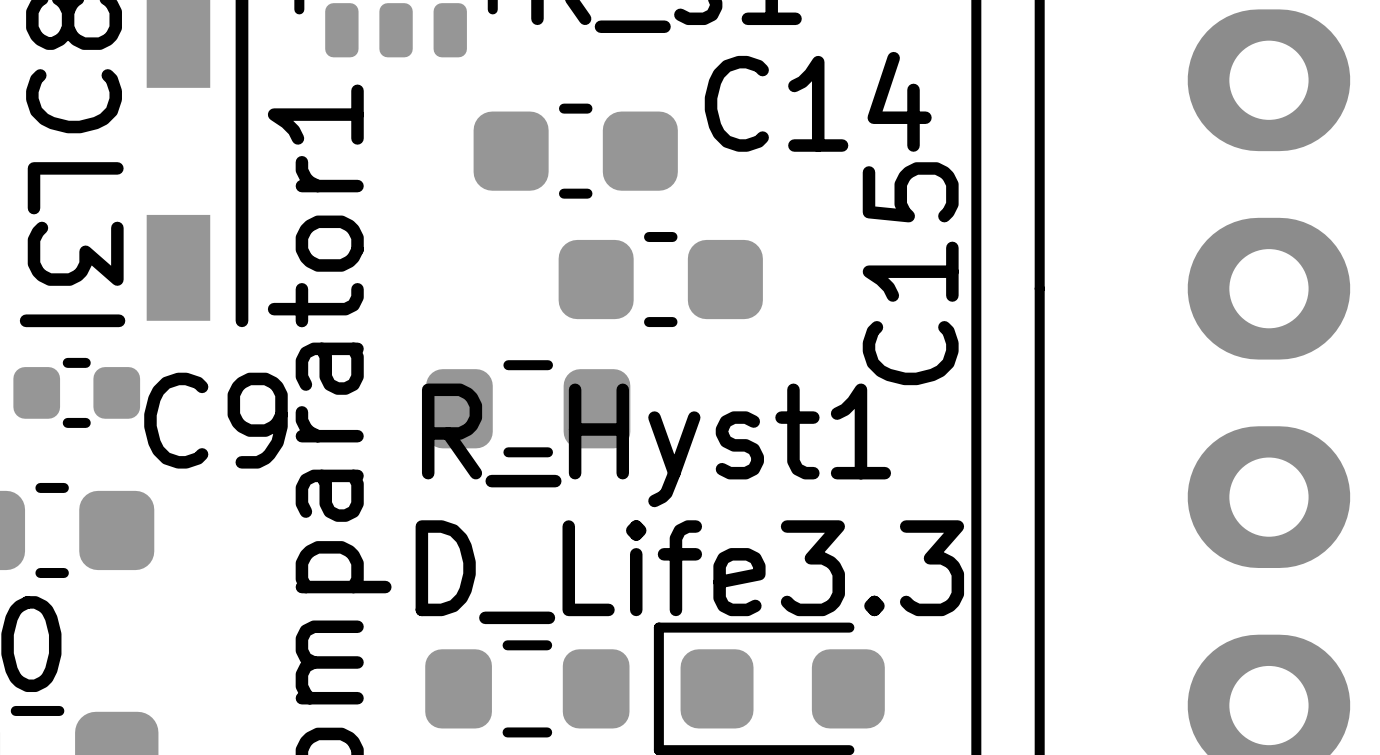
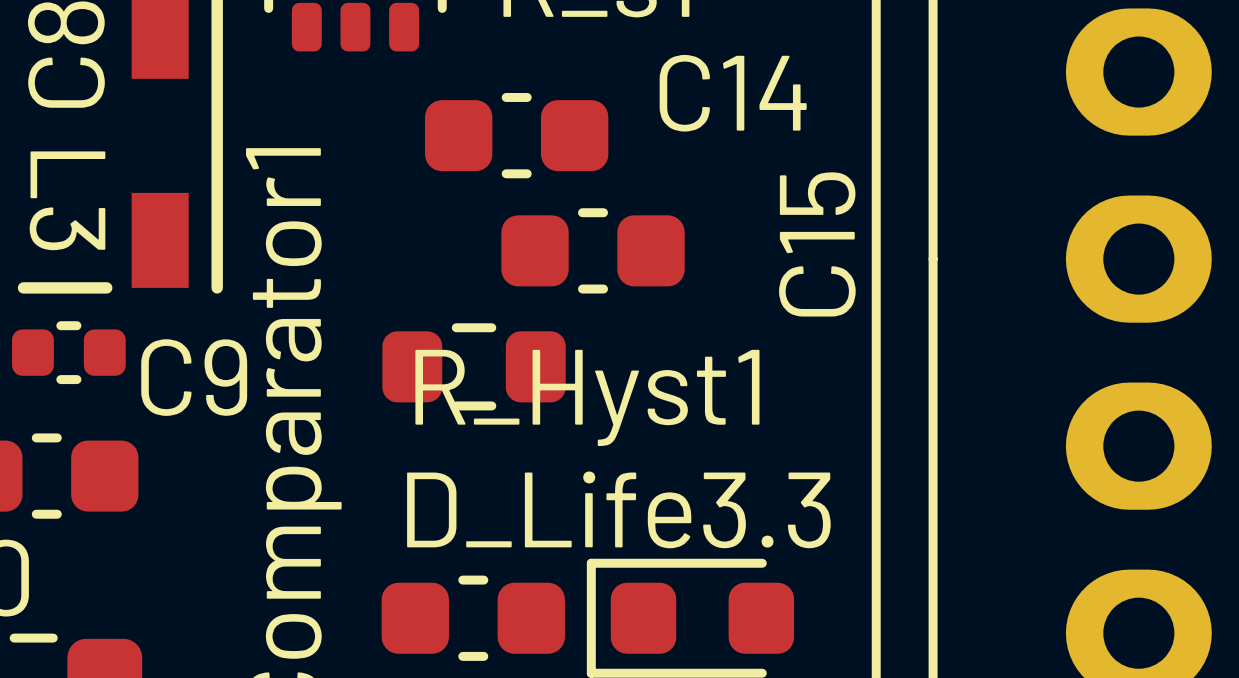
part footprint: [425, 640, 630, 738] -> [381, 575, 565, 661]

